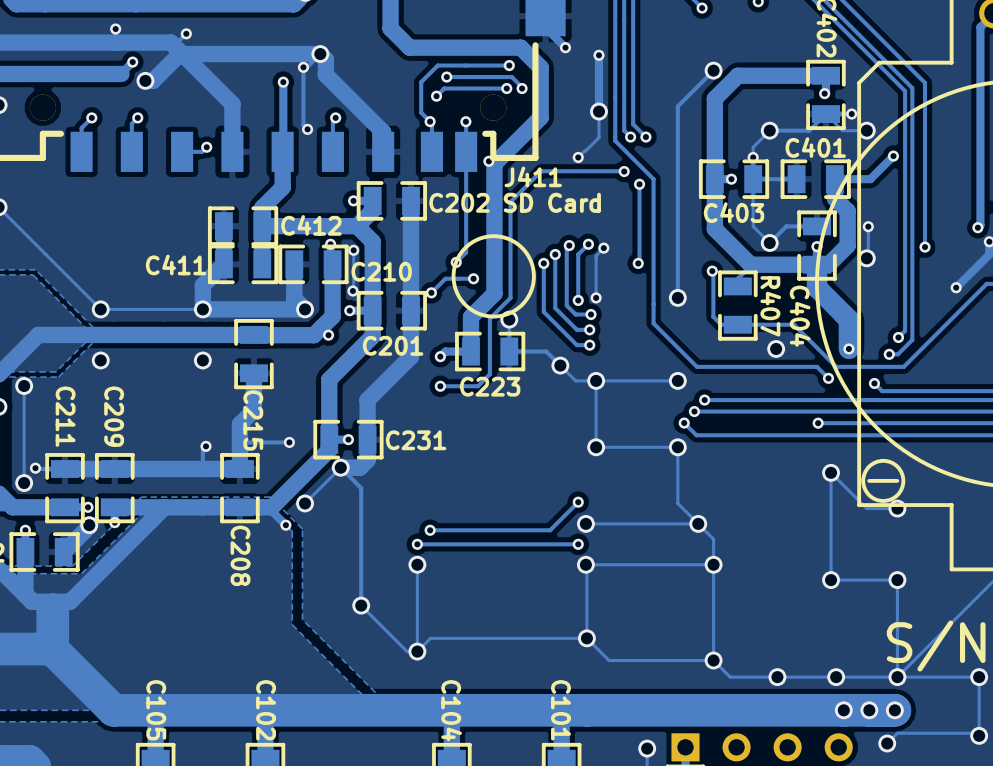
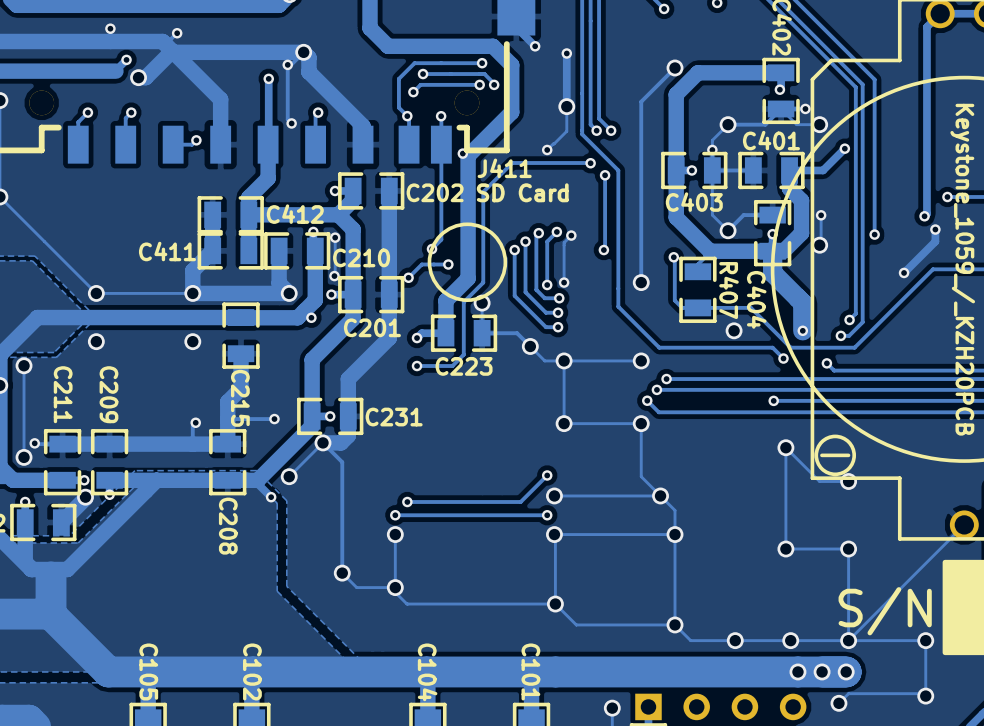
track: (376, 620) (407, 651) (417, 651) -> (356, 587) (395, 587)
track: (417, 626) (417, 651) -> (395, 592) (407, 604)
track: (430, 638) (417, 651) -> none
via position: (417, 651) -> (395, 587)

